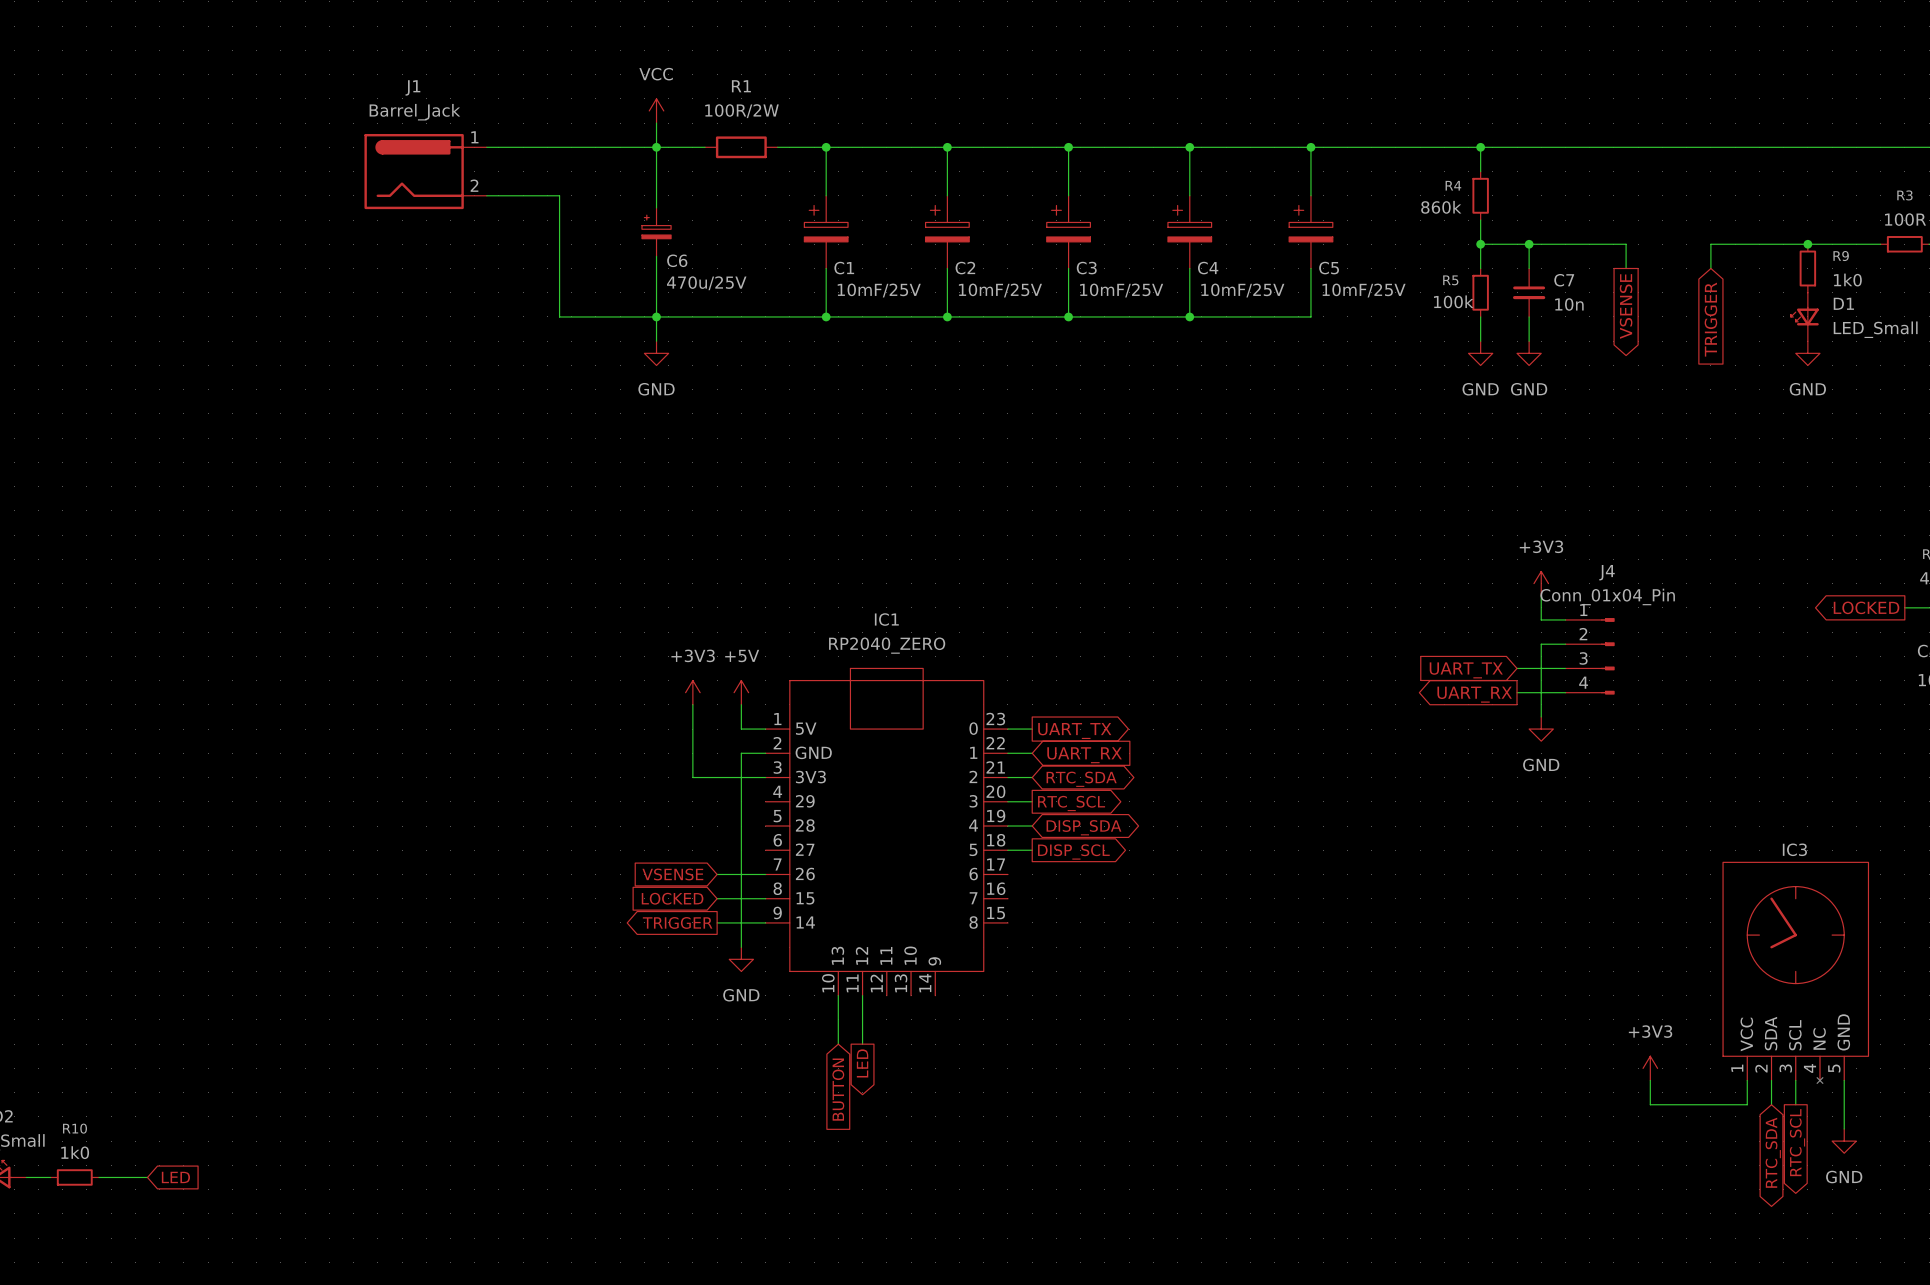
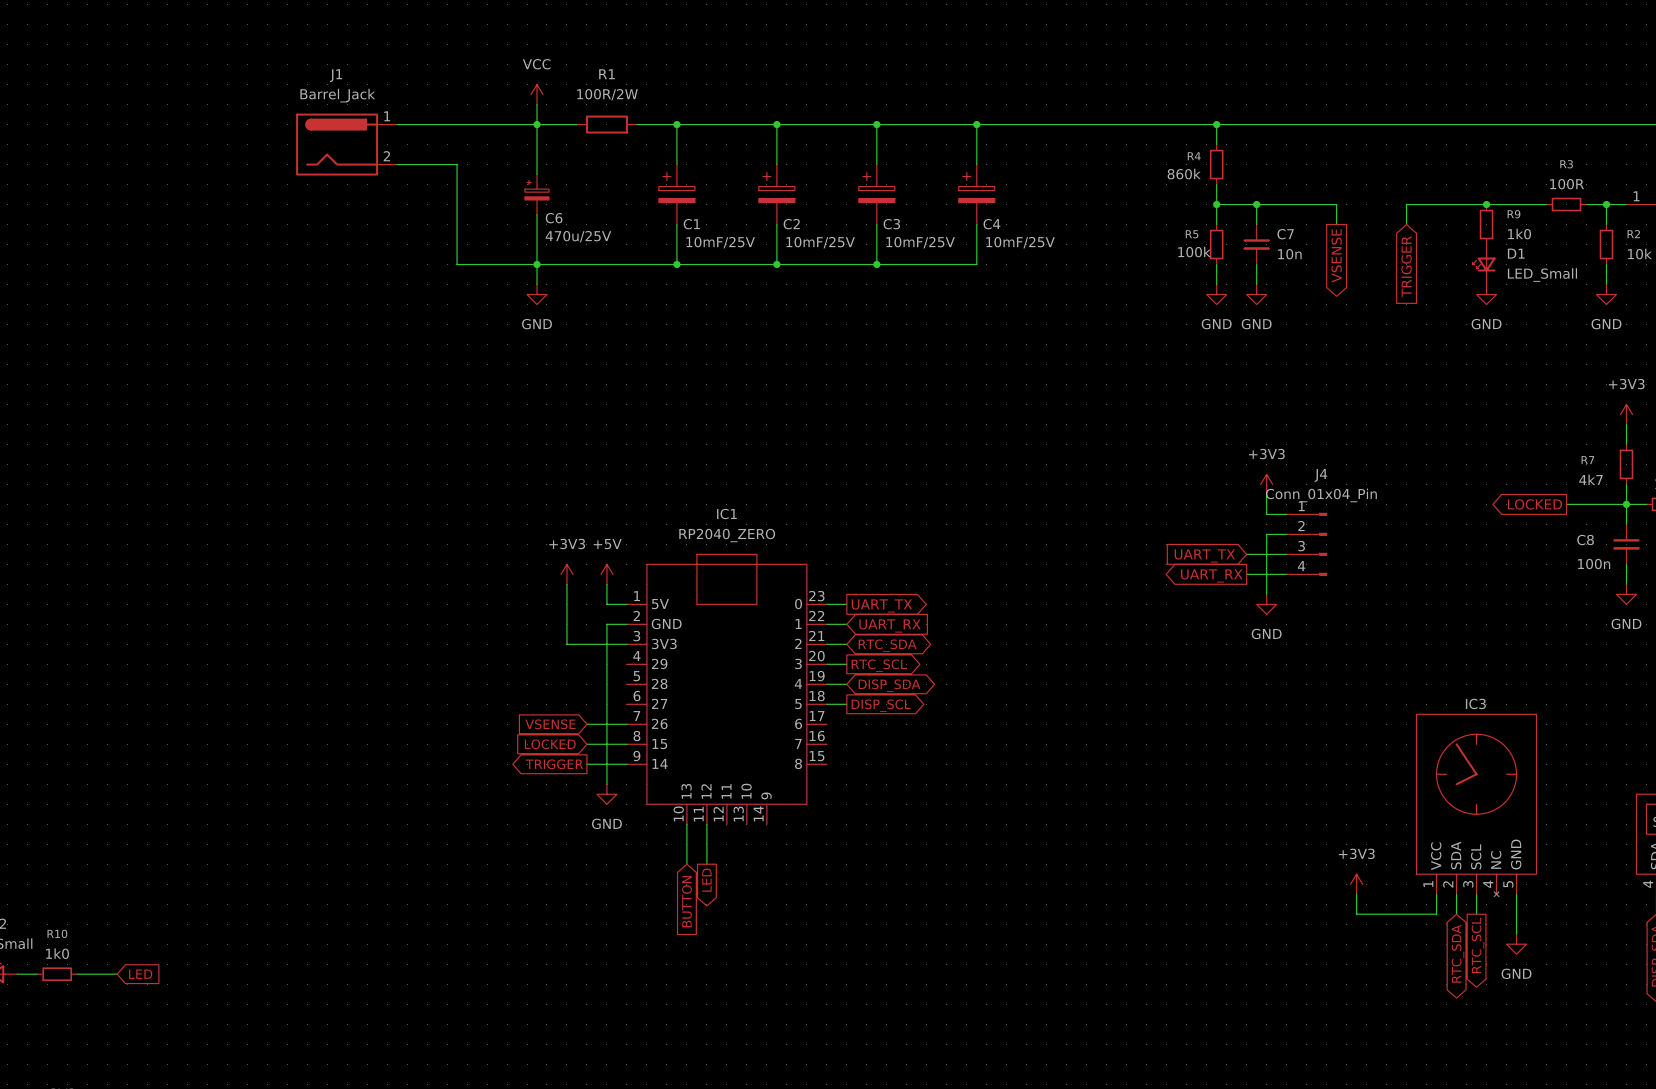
wire: (1310, 147) (1310, 195) -> none
junction: (1310, 147) -> none
C5: 10mF/25V (1310, 232) -> none
wire: (1310, 268) (1310, 316) (1189, 316) -> none
junction: (1189, 316) -> none

